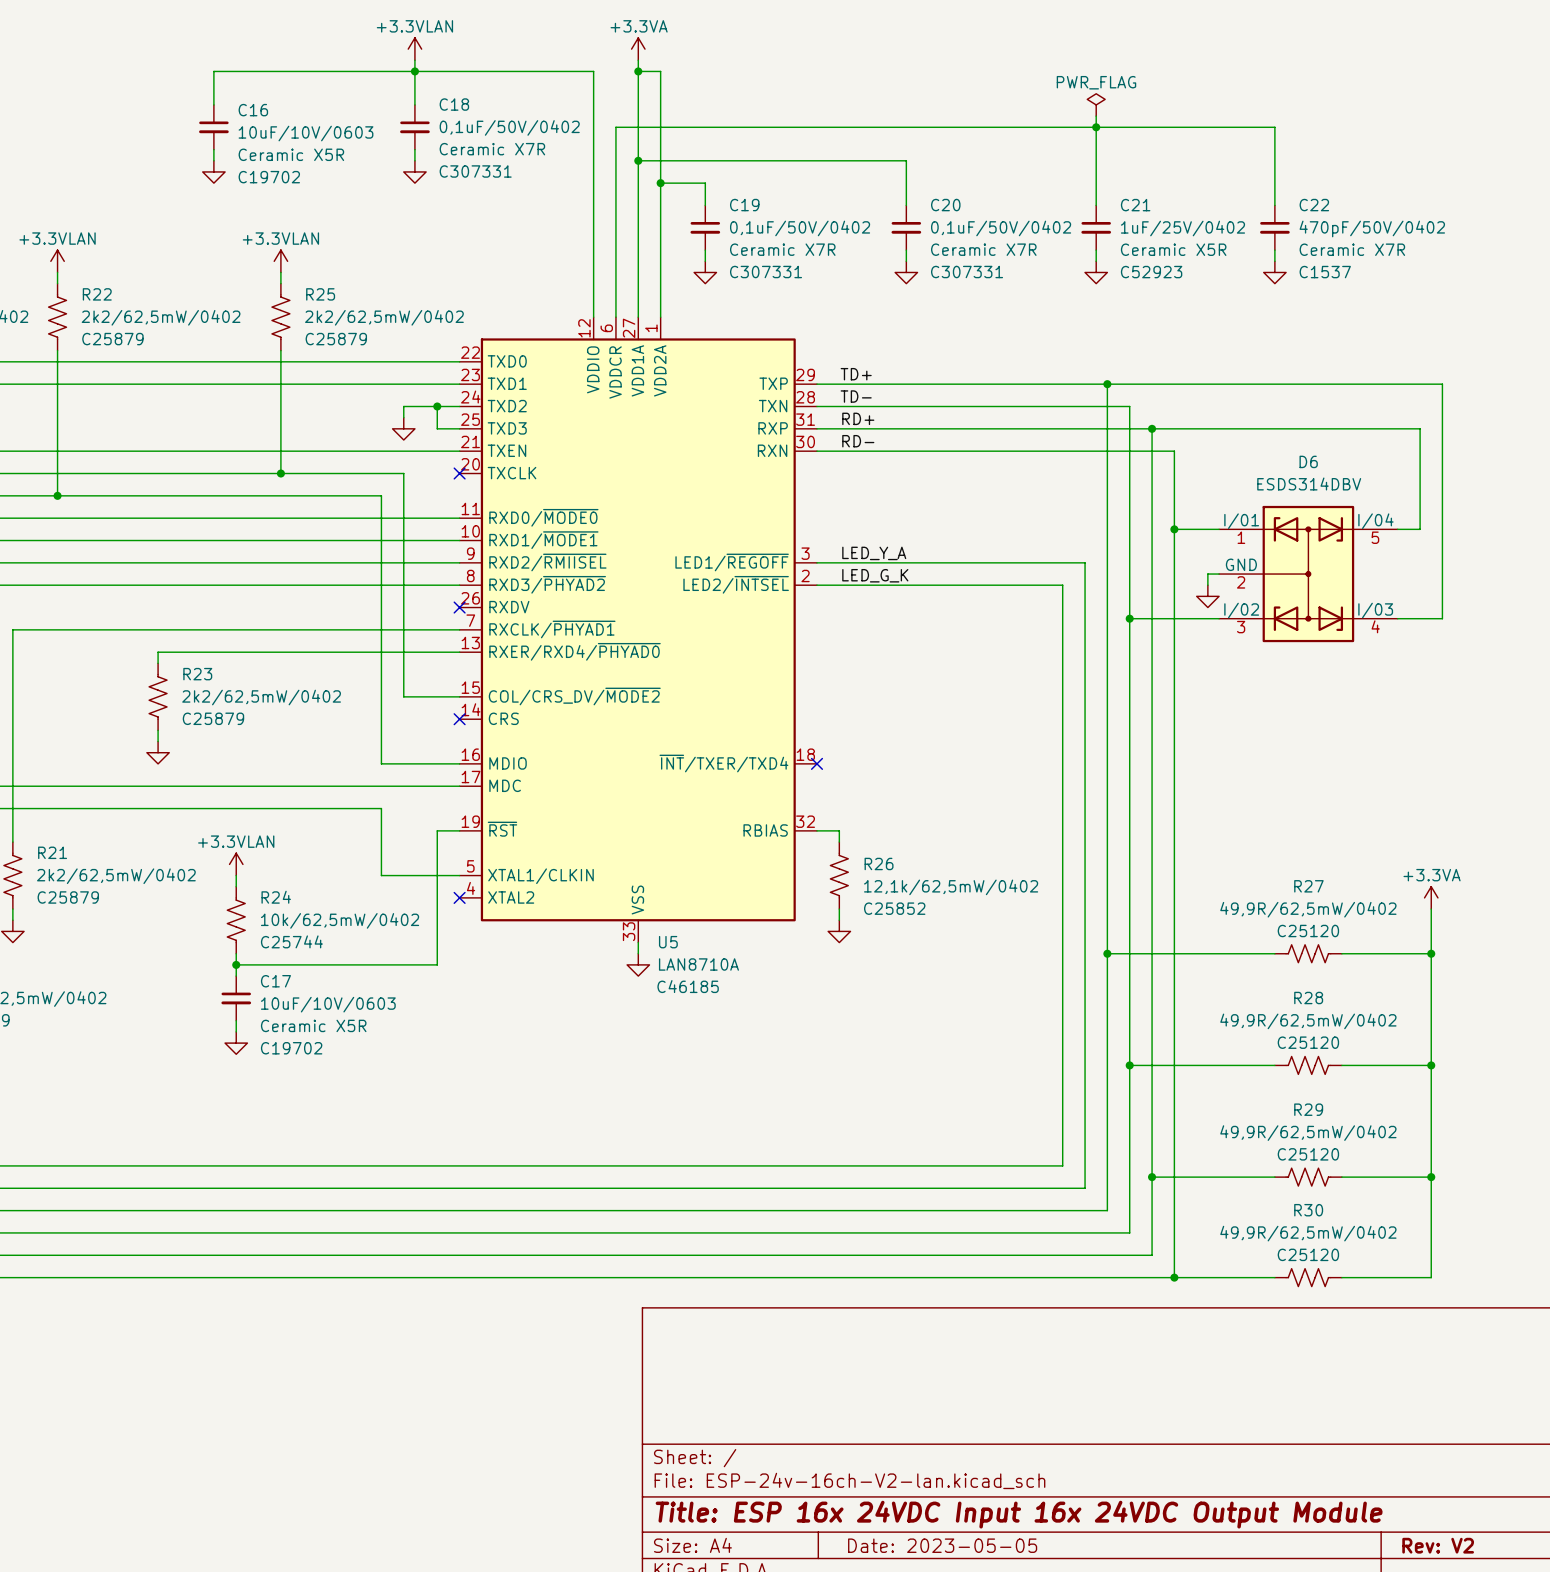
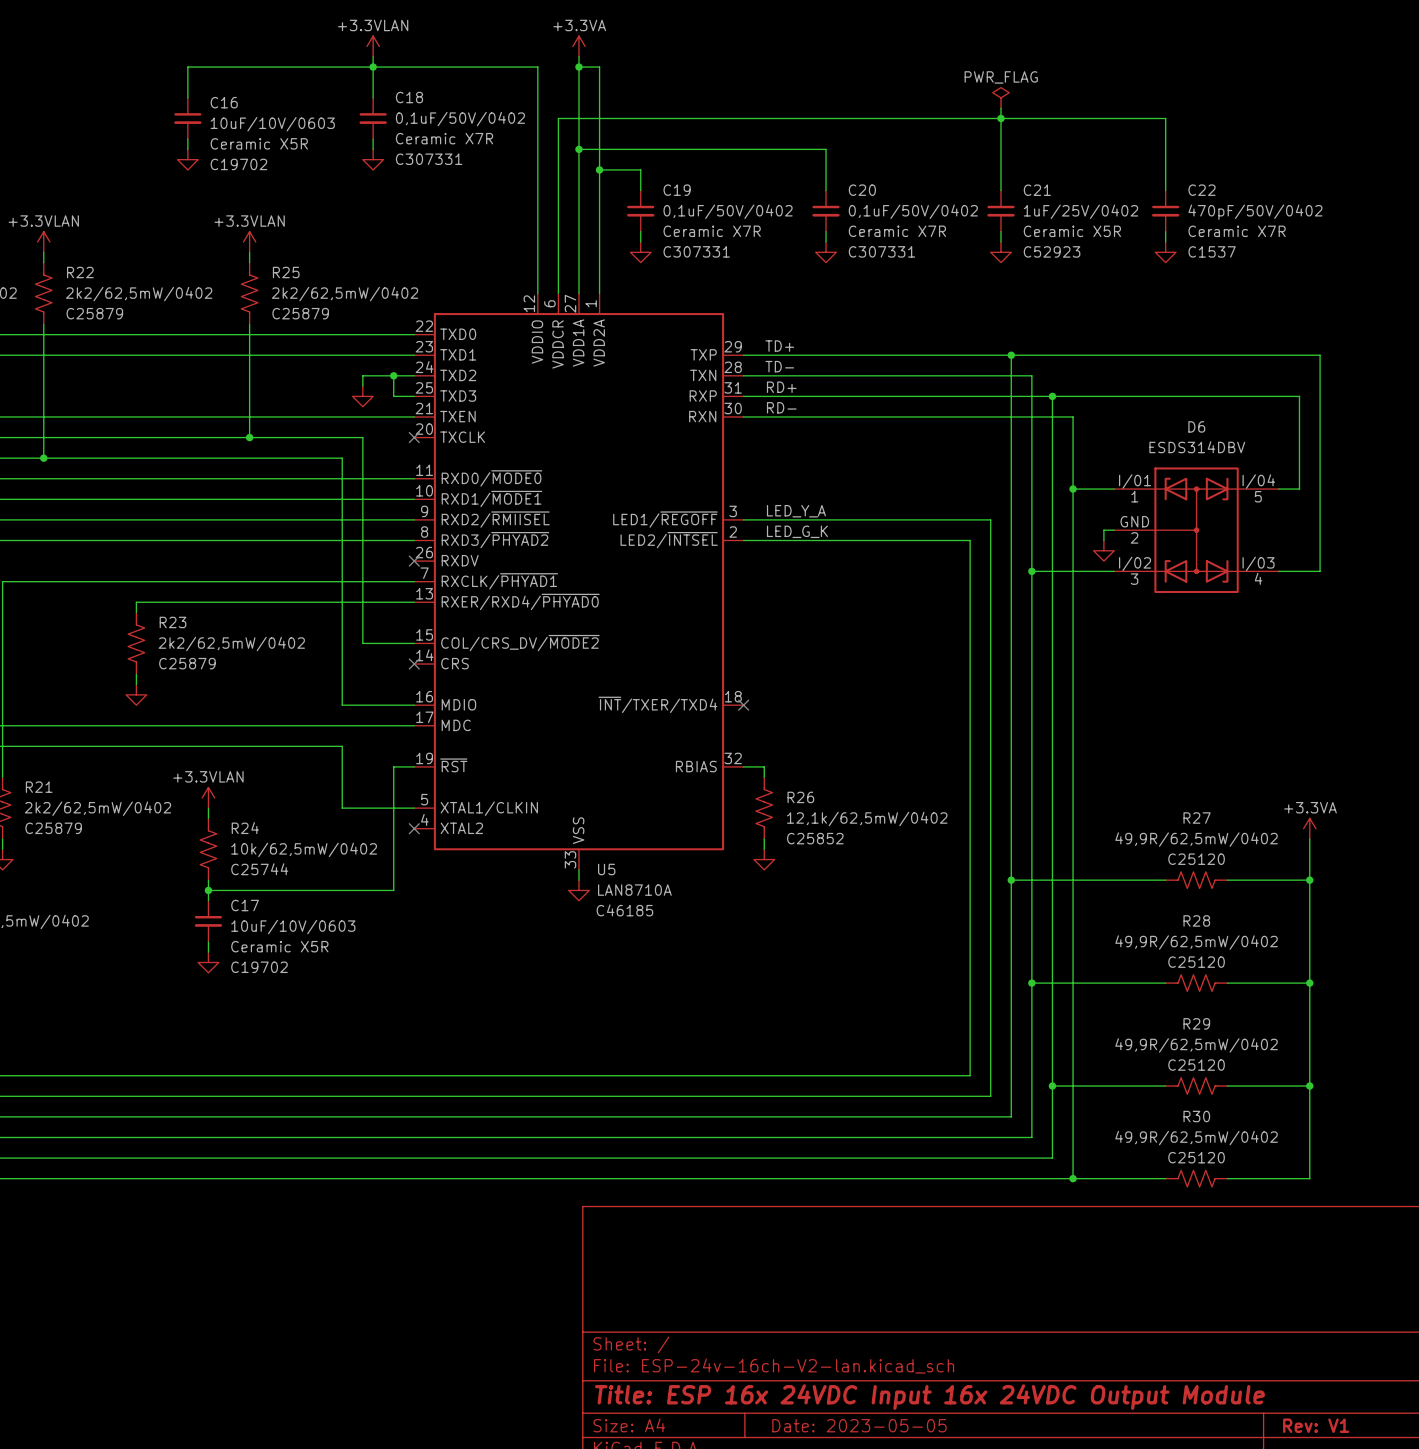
title block: Rev: V2 (1438, 1545) -> Rev: V1 (1316, 1425)

